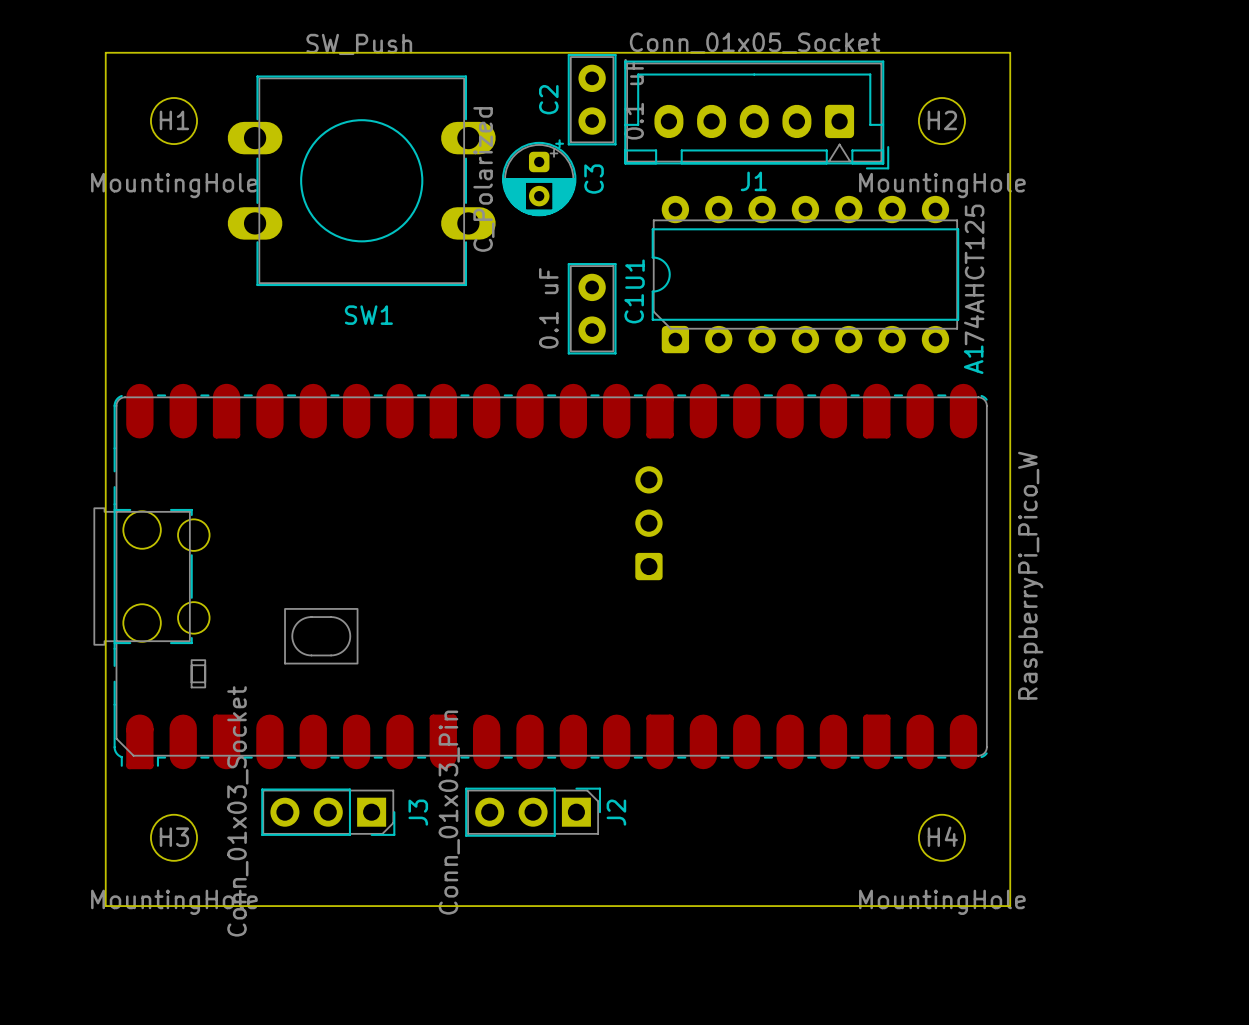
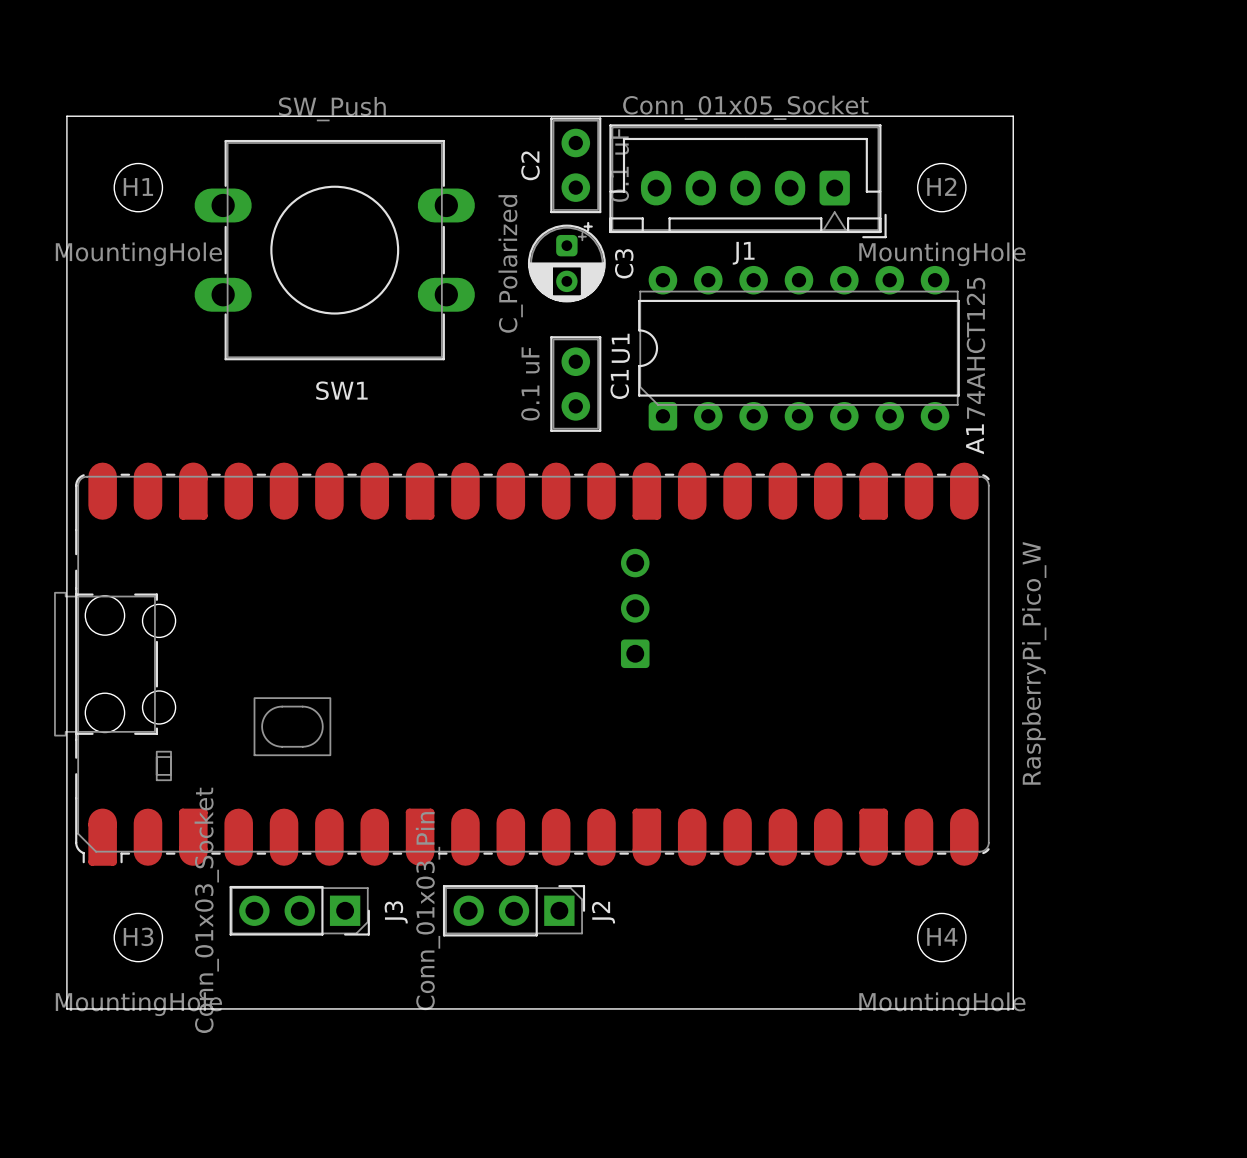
C3 position: (539, 177) -> (566, 262)

